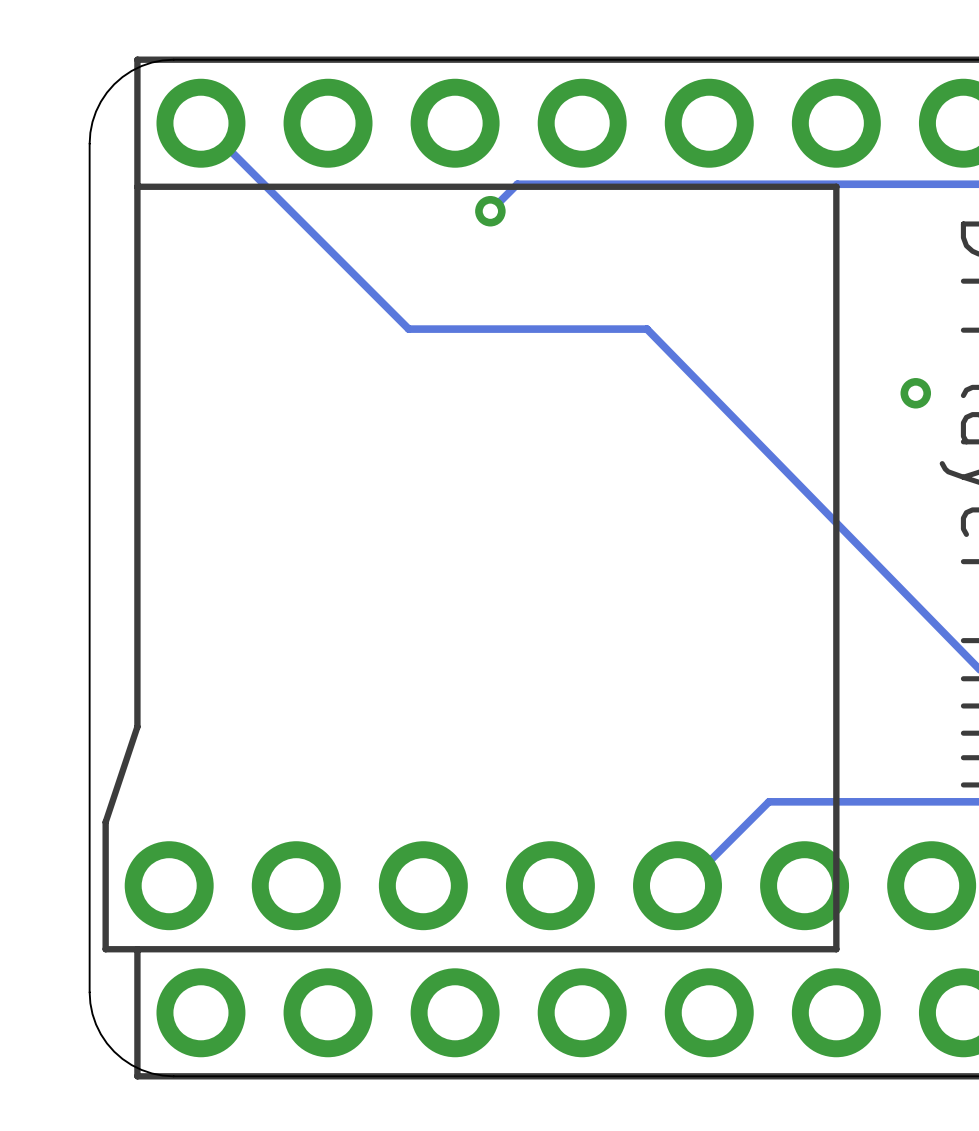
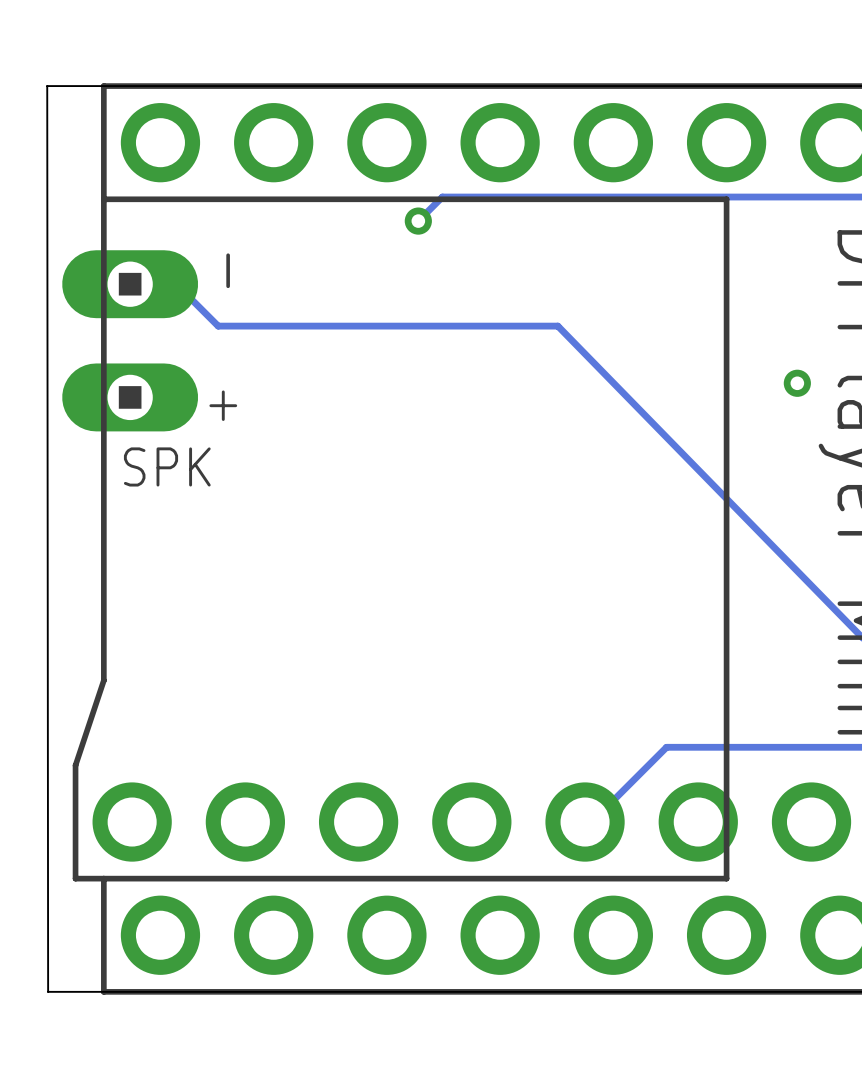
board edge: (173, 59) (141, 66) (114, 84) (96, 111) (89, 143) (90, 1003) (100, 1034) (122, 1058) (141, 1069) (173, 1076) -> (136, 86) (47, 86) (48, 991) (136, 991)
track: (204, 124) (408, 329) -> (130, 284) (177, 285) (218, 326) (345, 326)
text: none -> - (228, 270)
part: none -> SPK (130, 340)
text: none -> + (223, 405)

